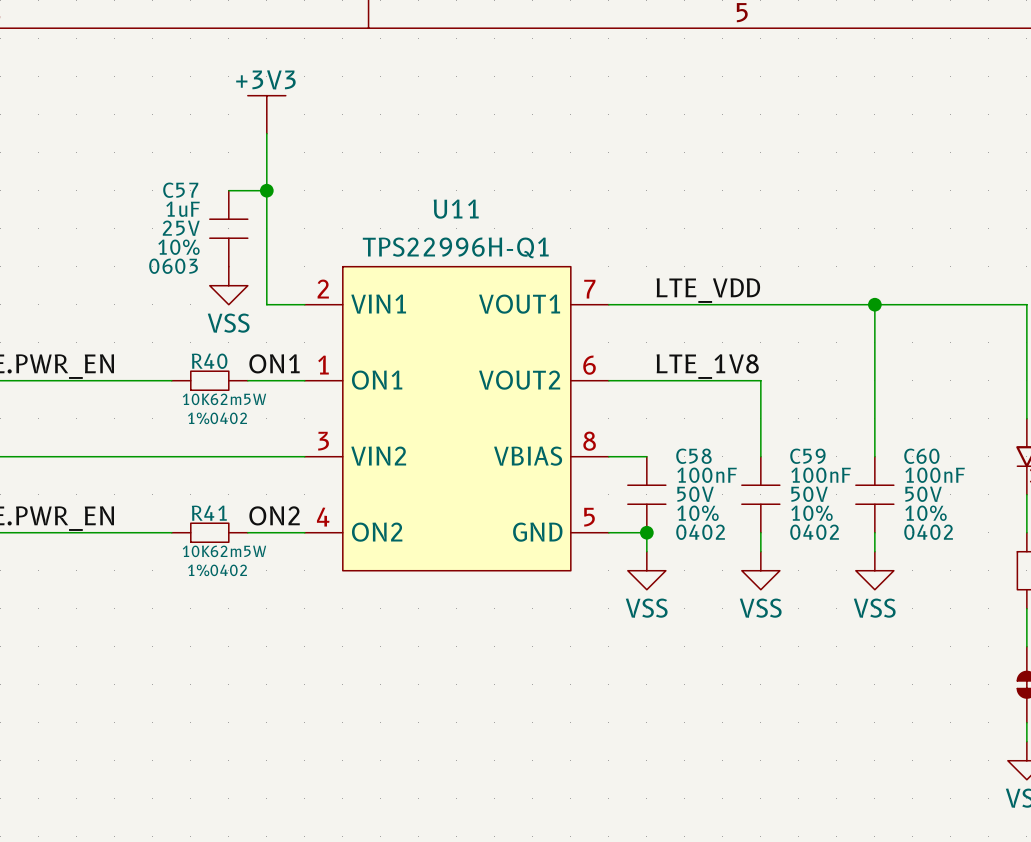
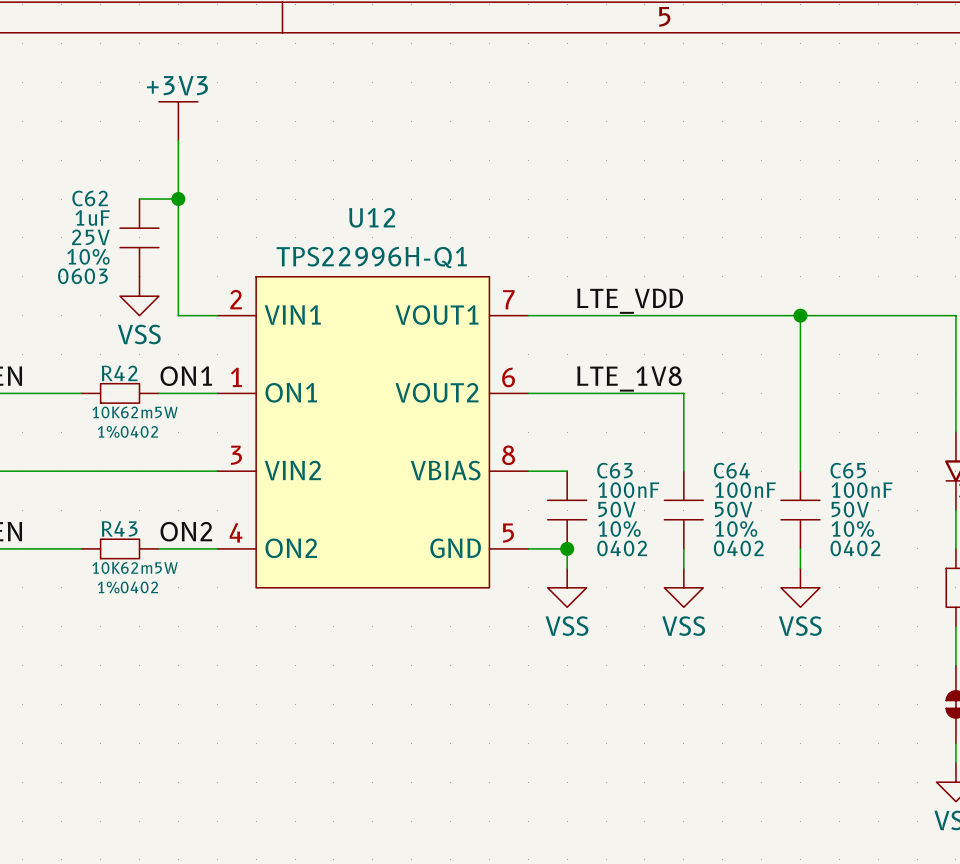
C57 name: C57 (180, 190) -> C62 (90, 198)
U11 name: U11 (456, 209) -> U12 (372, 217)
R40 name: R40 (209, 361) -> R42 (119, 373)
C58 name: C58 (693, 456) -> C63 (614, 470)
C59 name: C59 (807, 456) -> C64 (731, 470)
C60 name: C60 (921, 456) -> C65 (848, 470)
R41 name: R41 (209, 513) -> R43 (119, 528)

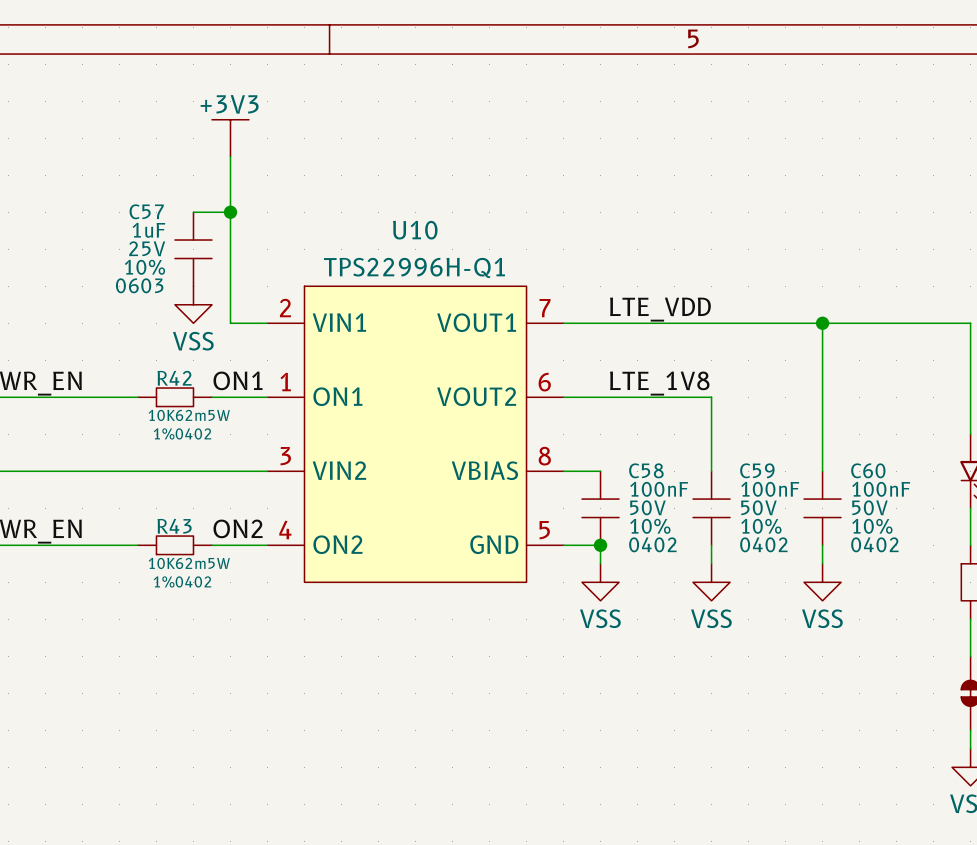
C62 name: C62 (90, 198) -> C57 (146, 211)
U12 name: U12 (372, 217) -> U10 (415, 230)
C63 name: C63 (614, 470) -> C58 (646, 470)
C64 name: C64 (731, 470) -> C59 (757, 470)
C65 name: C65 (848, 470) -> C60 (868, 470)

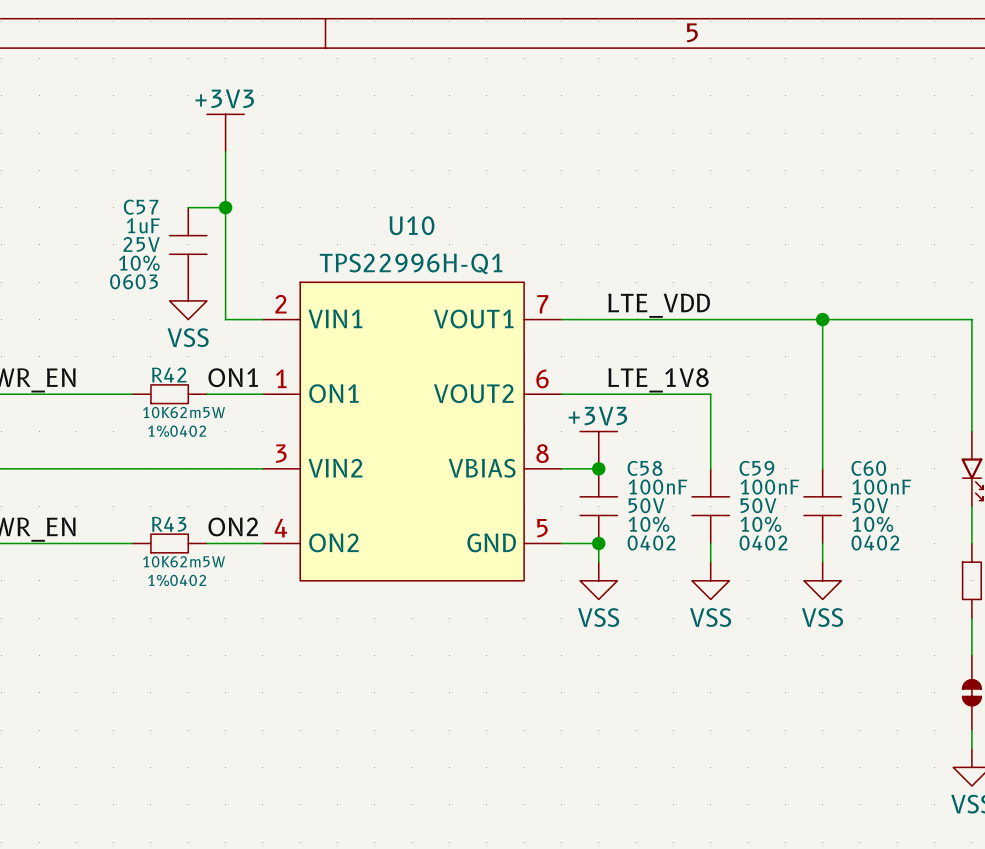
power symbol: none -> +3V3 (598, 450)
junction: none -> (598, 468)

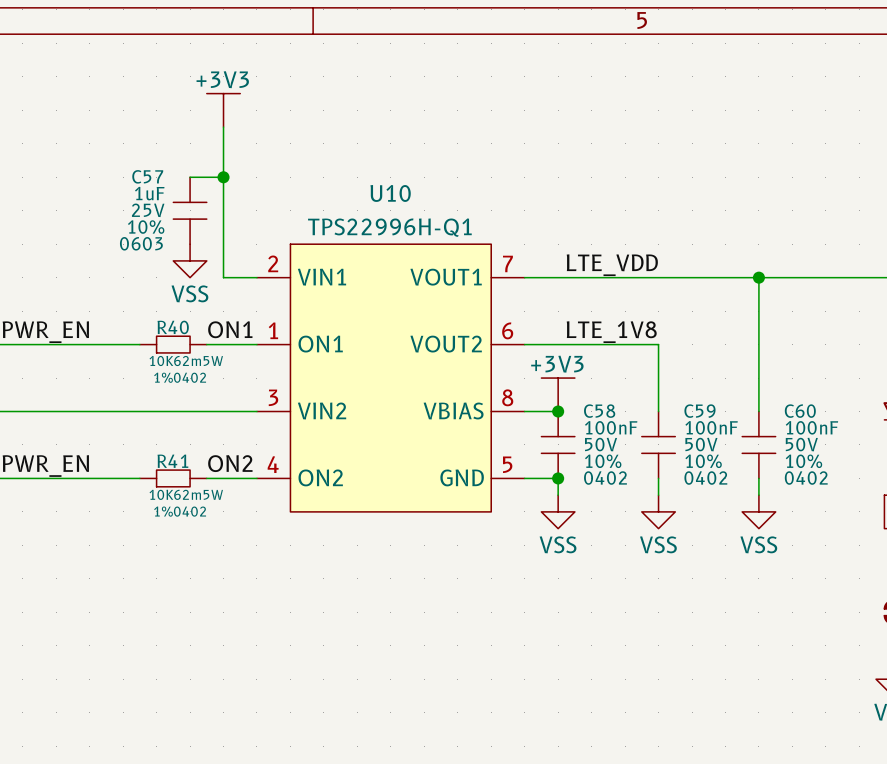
R42 name: R42 (169, 375) -> R40 (173, 327)
R43 name: R43 (169, 524) -> R41 (172, 461)

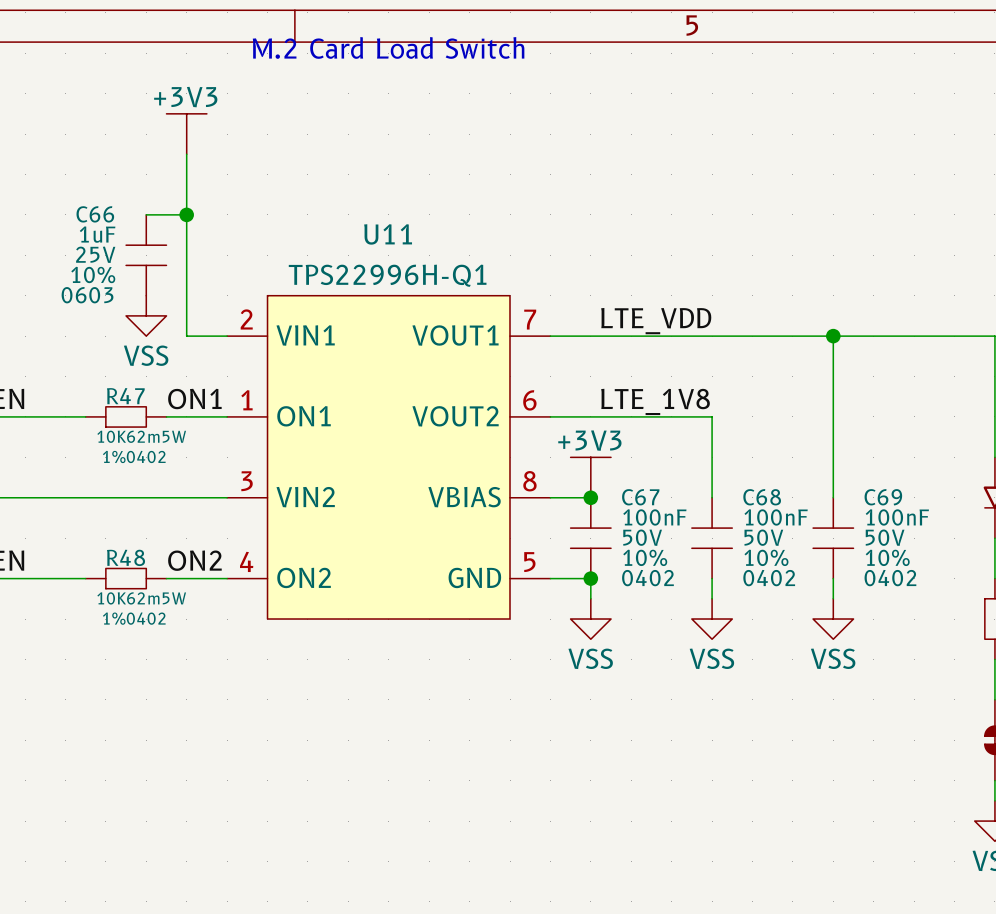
text: none -> M.2 Card Load Switch (388, 47)
C57 name: C57 (147, 176) -> C66 (95, 214)
U10 name: U10 (390, 193) -> U11 (388, 234)
R40 name: R40 (173, 327) -> R47 (125, 396)
C58 name: C58 (599, 411) -> C67 (640, 497)
C59 name: C59 (699, 411) -> C68 (762, 497)
C60 name: C60 (800, 411) -> C69 (883, 497)
R41 name: R41 (172, 461) -> R48 (126, 557)

